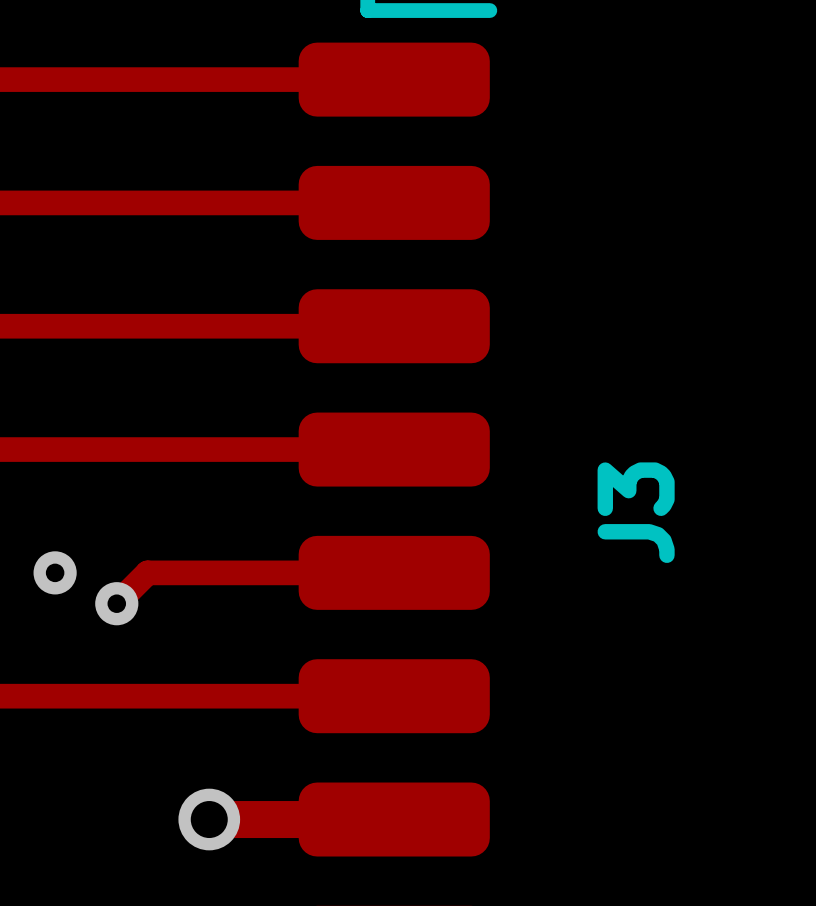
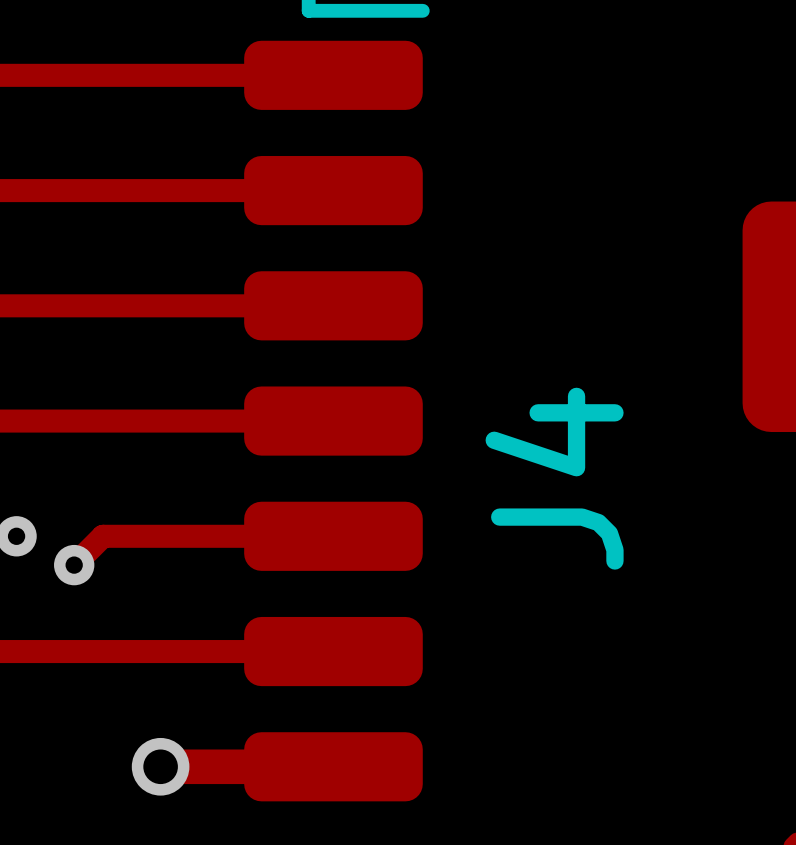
J3 name: J3 (636, 512) -> J4 (554, 478)

